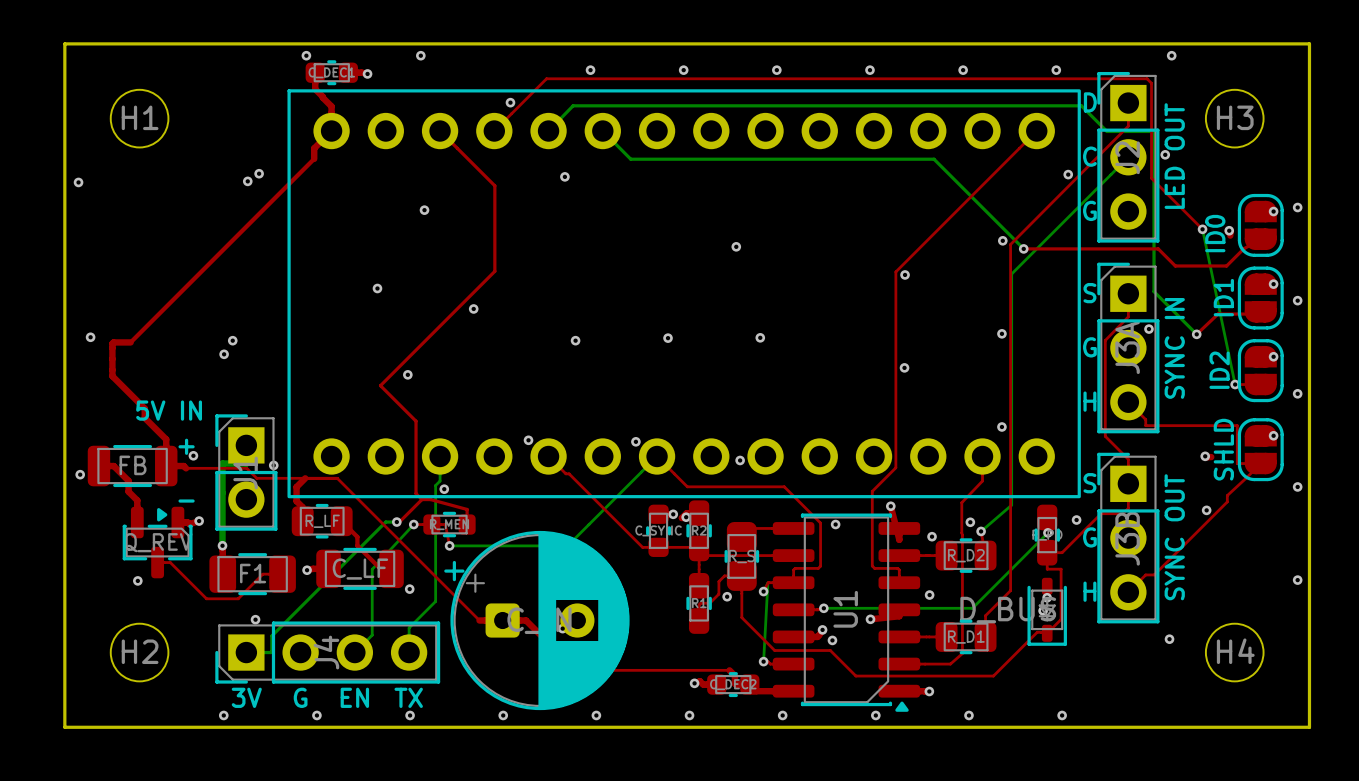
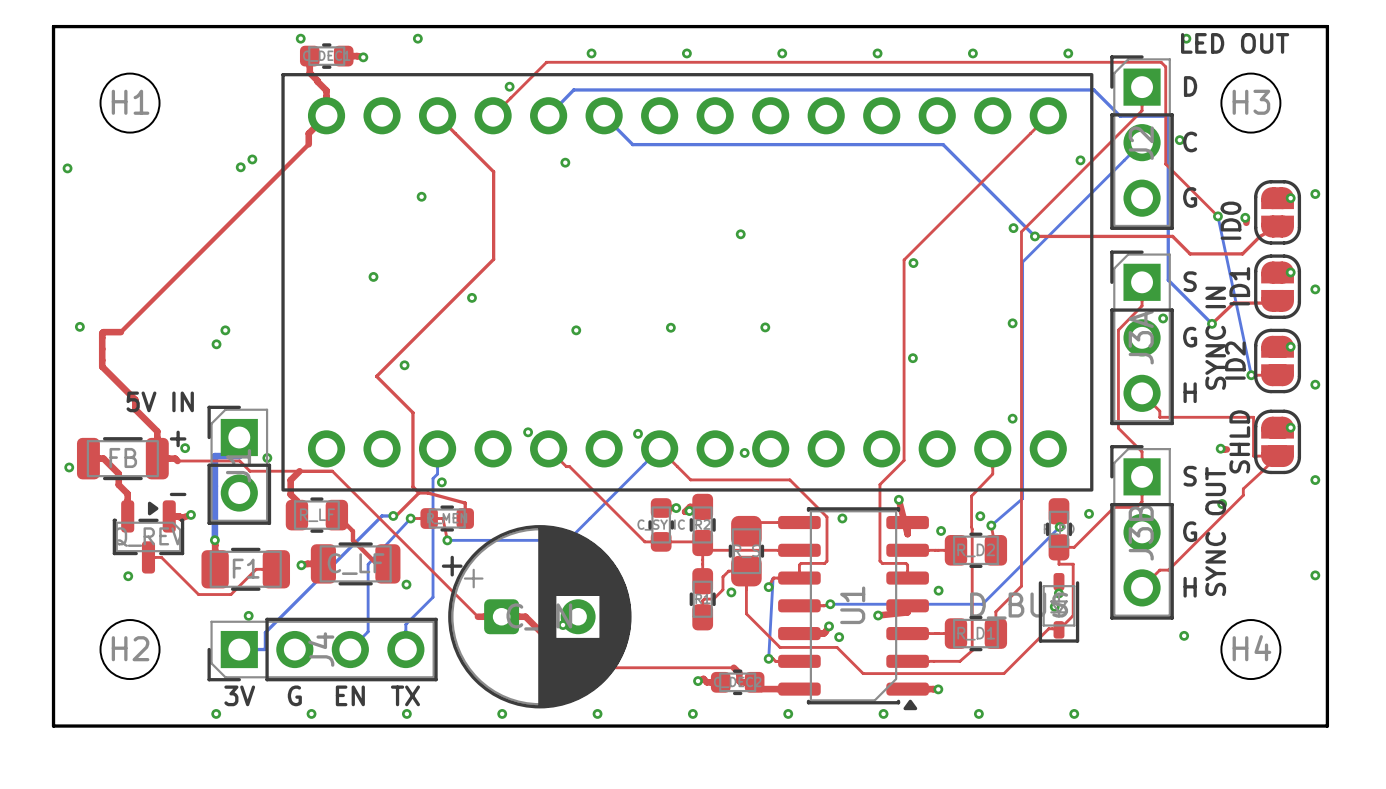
text: none -> LED OUT (1235, 43)
text position: D (1090, 102) -> D (1190, 86)
text: C (1089, 156) -> none
text: LED OUT (1174, 156) -> C (1190, 141)
text: G (1089, 210) -> none
text: none -> G (1190, 197)
text position: S (1089, 293) -> S (1190, 281)
text: G (1089, 347) -> none
text: SYNC IN (1174, 348) -> G (1190, 337)
text: none -> SYNC IN (1215, 338)
text position: H (1089, 401) -> H (1190, 392)
text position: S (1089, 483) -> S (1190, 476)
text: G (1089, 537) -> none
text: SYNC OUT (1174, 537) -> G (1190, 531)
text: none -> SYNC OUT (1215, 531)
text position: H (1089, 591) -> H (1190, 587)

